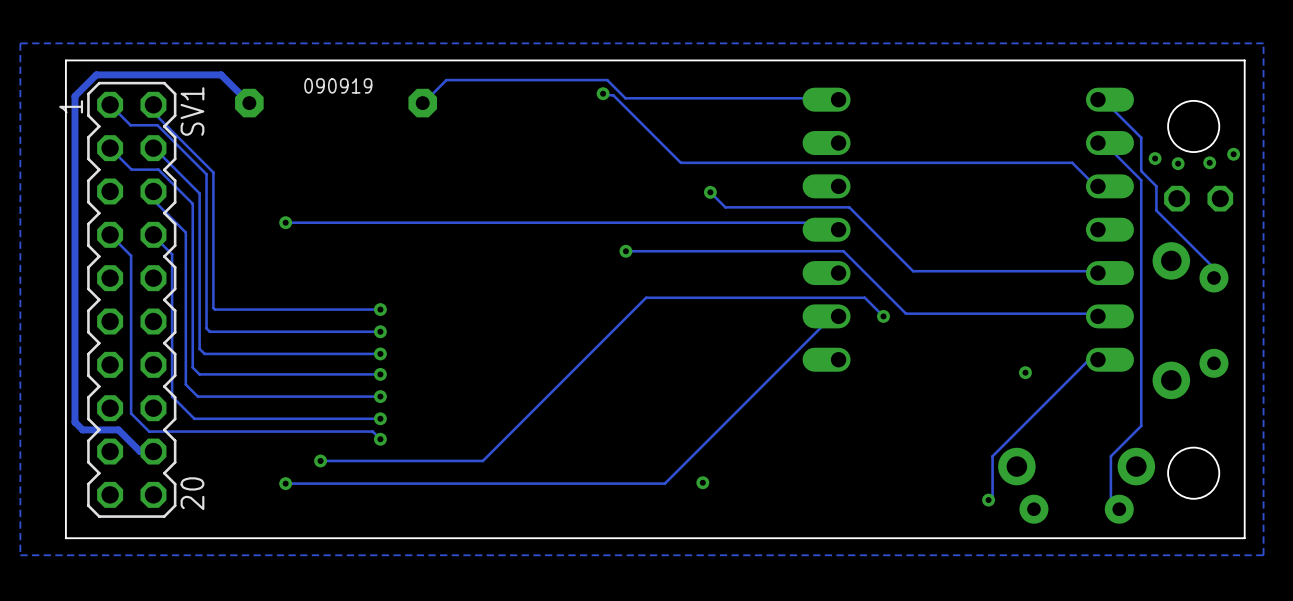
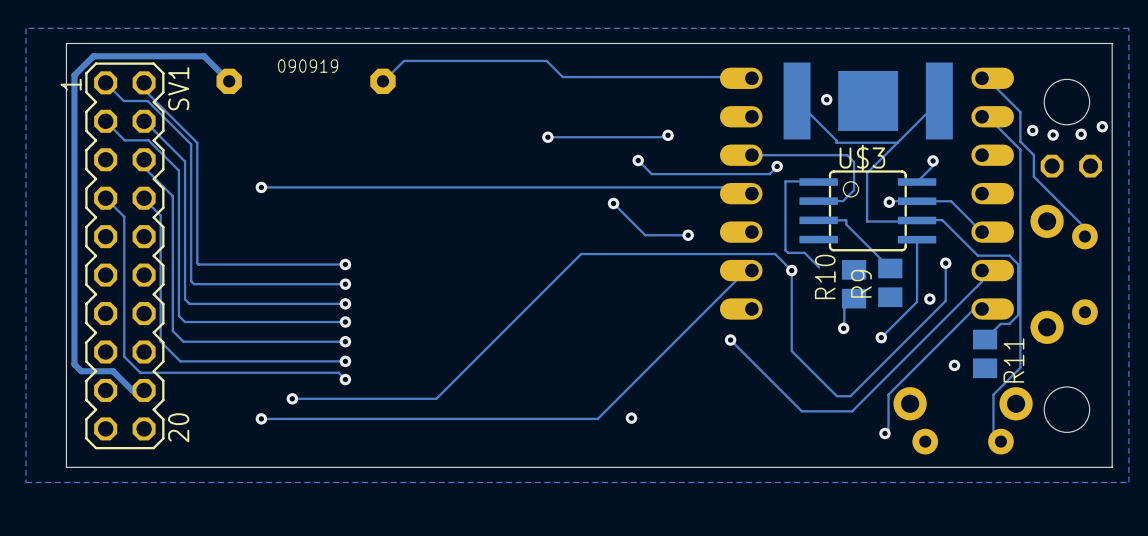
track: (603, 93) (613, 95) (680, 162) (1072, 162) (1095, 186) -> none
via: (603, 93) -> none
via: none -> (826, 99)
track: none -> (797, 100) (836, 140) (836, 142) (897, 142)
part: none -> (868, 100)
track: none -> (939, 100) (867, 173) (867, 221) (942, 220) (977, 255) (1009, 255) (1018, 264) (1018, 315) (1009, 323) (1000, 323) (985, 339)
via: none -> (668, 135)
track: none -> (668, 135) (665, 138) (547, 137)
via: none -> (547, 137)
track: none -> (751, 155) (847, 155) (854, 162) (854, 190) (843, 201) (818, 201)
track: none -> (933, 160) (933, 166) (917, 182)
via: none -> (933, 160)
via: none -> (777, 166)
track: (725, 207) (849, 207) (913, 271) (1095, 271) -> (651, 173) (769, 174) (777, 166)
track: none -> (818, 182) (785, 181) (785, 250) (788, 252) (804, 252) (819, 267)
track: none -> (888, 201) (951, 201) (982, 232)
via: none -> (889, 202)
track: none -> (613, 203) (645, 235) (688, 235)
via: none -> (613, 203)
U$3: none -> (867, 210)
track: (625, 251) (843, 251) (906, 313) (1095, 313) -> none
via: (625, 251) -> none
track: none -> (818, 220) (845, 220) (846, 224) (890, 268)
via: none -> (688, 235)
track: none -> (917, 239) (917, 301) (881, 337)
track: none -> (945, 263) (945, 300) (850, 396) (836, 396) (791, 350) (791, 270)
via: none -> (945, 263)
track: none -> (982, 270) (981, 282) (852, 411) (801, 411) (730, 340)
R9: none -> (890, 282)
R10: none -> (854, 284)
track: none -> (854, 298) (844, 308) (843, 328)
via: none -> (929, 299)
via: (1025, 372) -> none
via: none -> (843, 328)
via: none -> (881, 337)
via: none -> (730, 340)
R11: none -> (985, 353)
via: none -> (954, 365)

